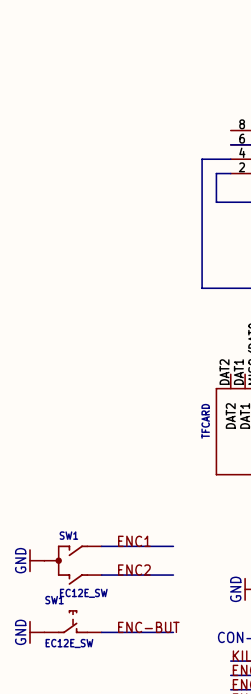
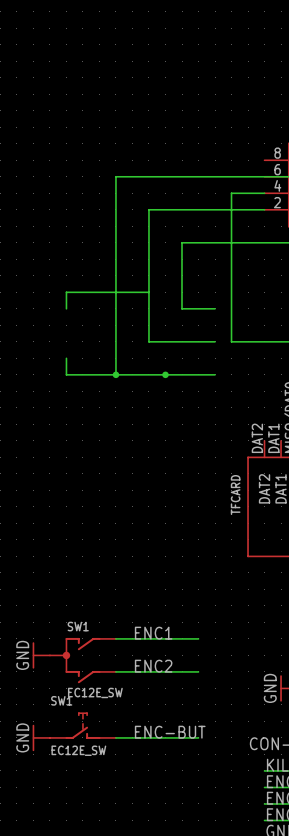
wire: none -> (264, 176) (115, 176) (115, 374)
wire: (216, 173) (216, 202) -> (248, 209) (148, 209) (148, 341) (215, 341)
wire: none -> (248, 242) (182, 242) (182, 308) (215, 308)
wire: none -> (148, 292) (66, 292) (66, 308)
wire: none -> (66, 358) (66, 374) (215, 374)
junction: none -> (115, 374)
junction: none -> (165, 374)

